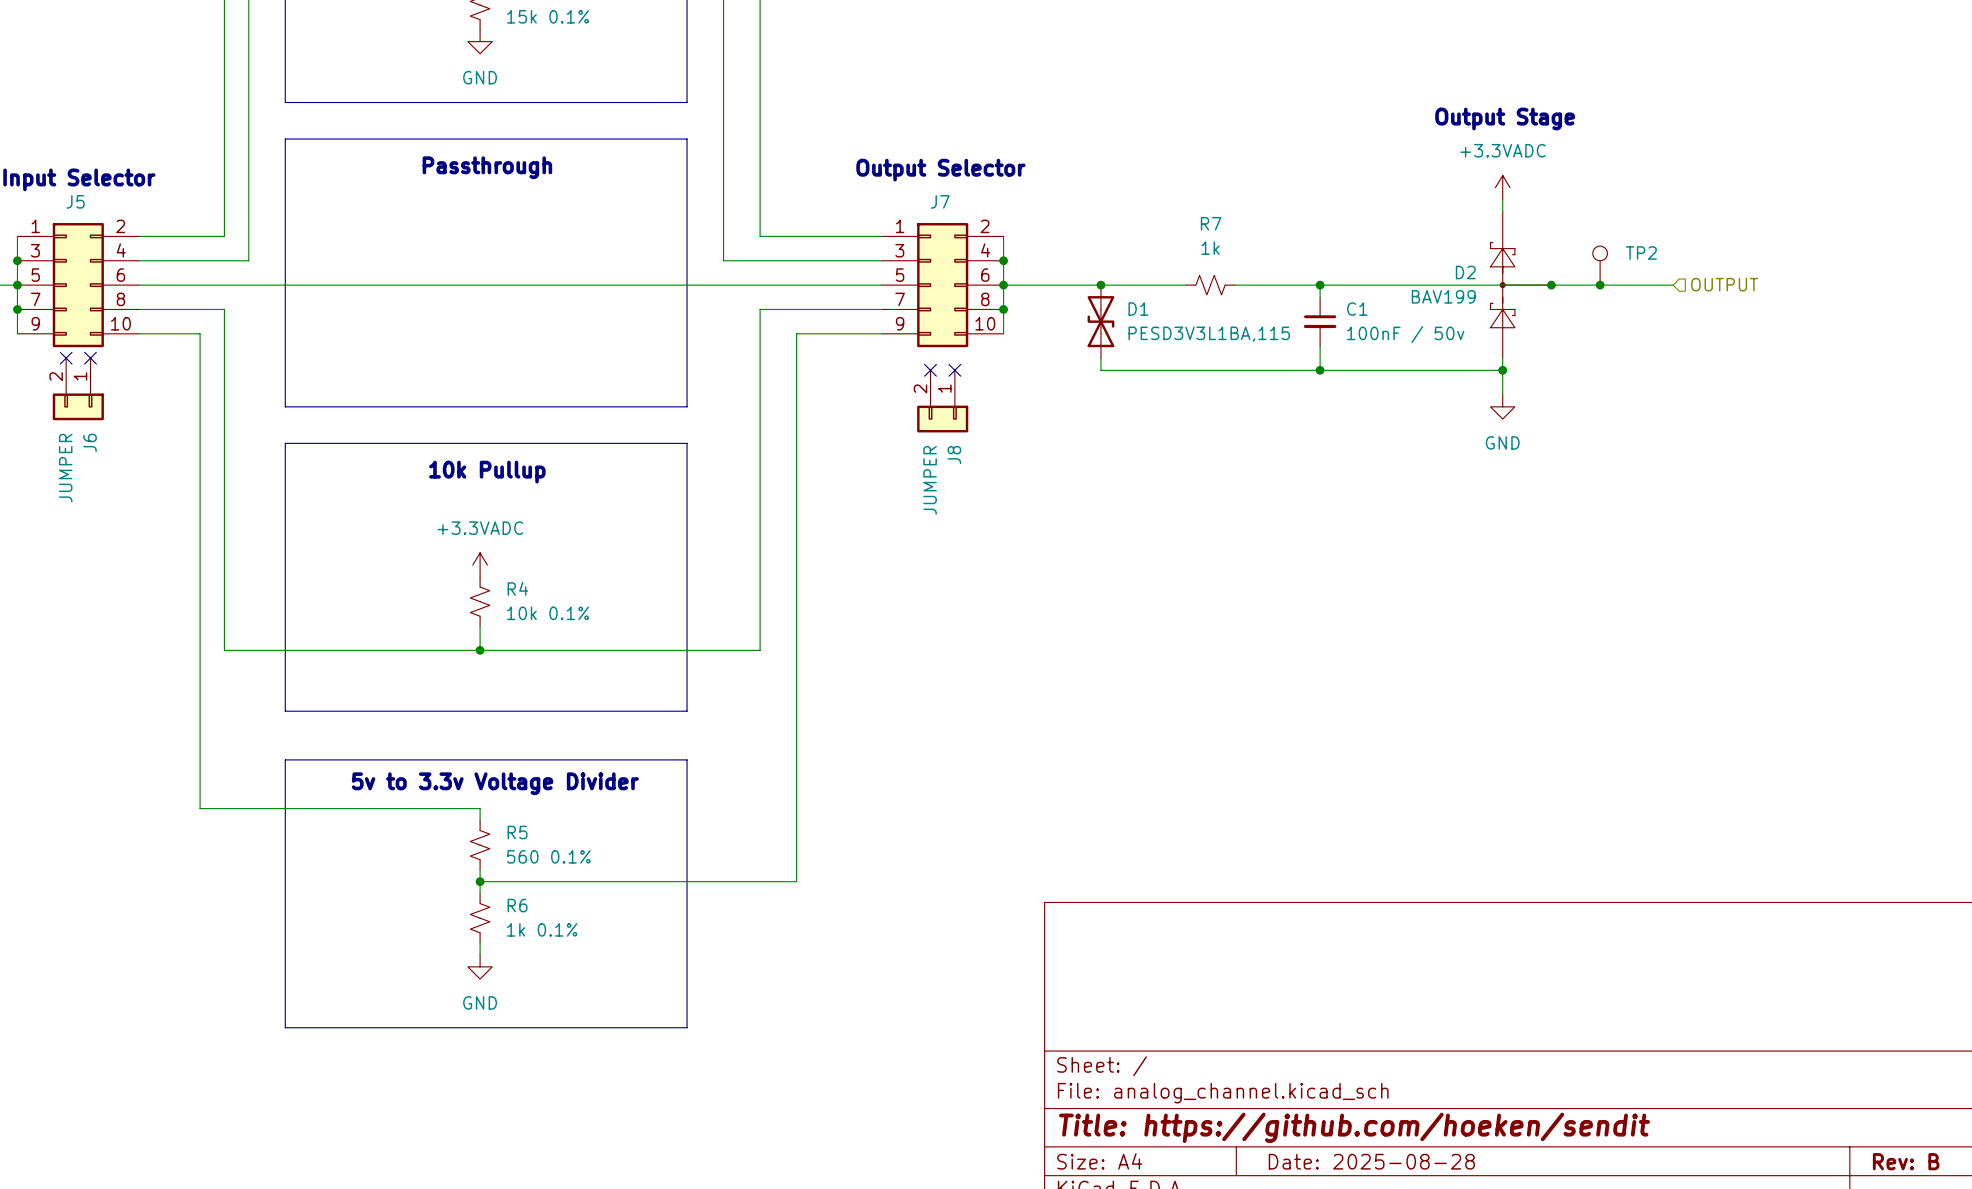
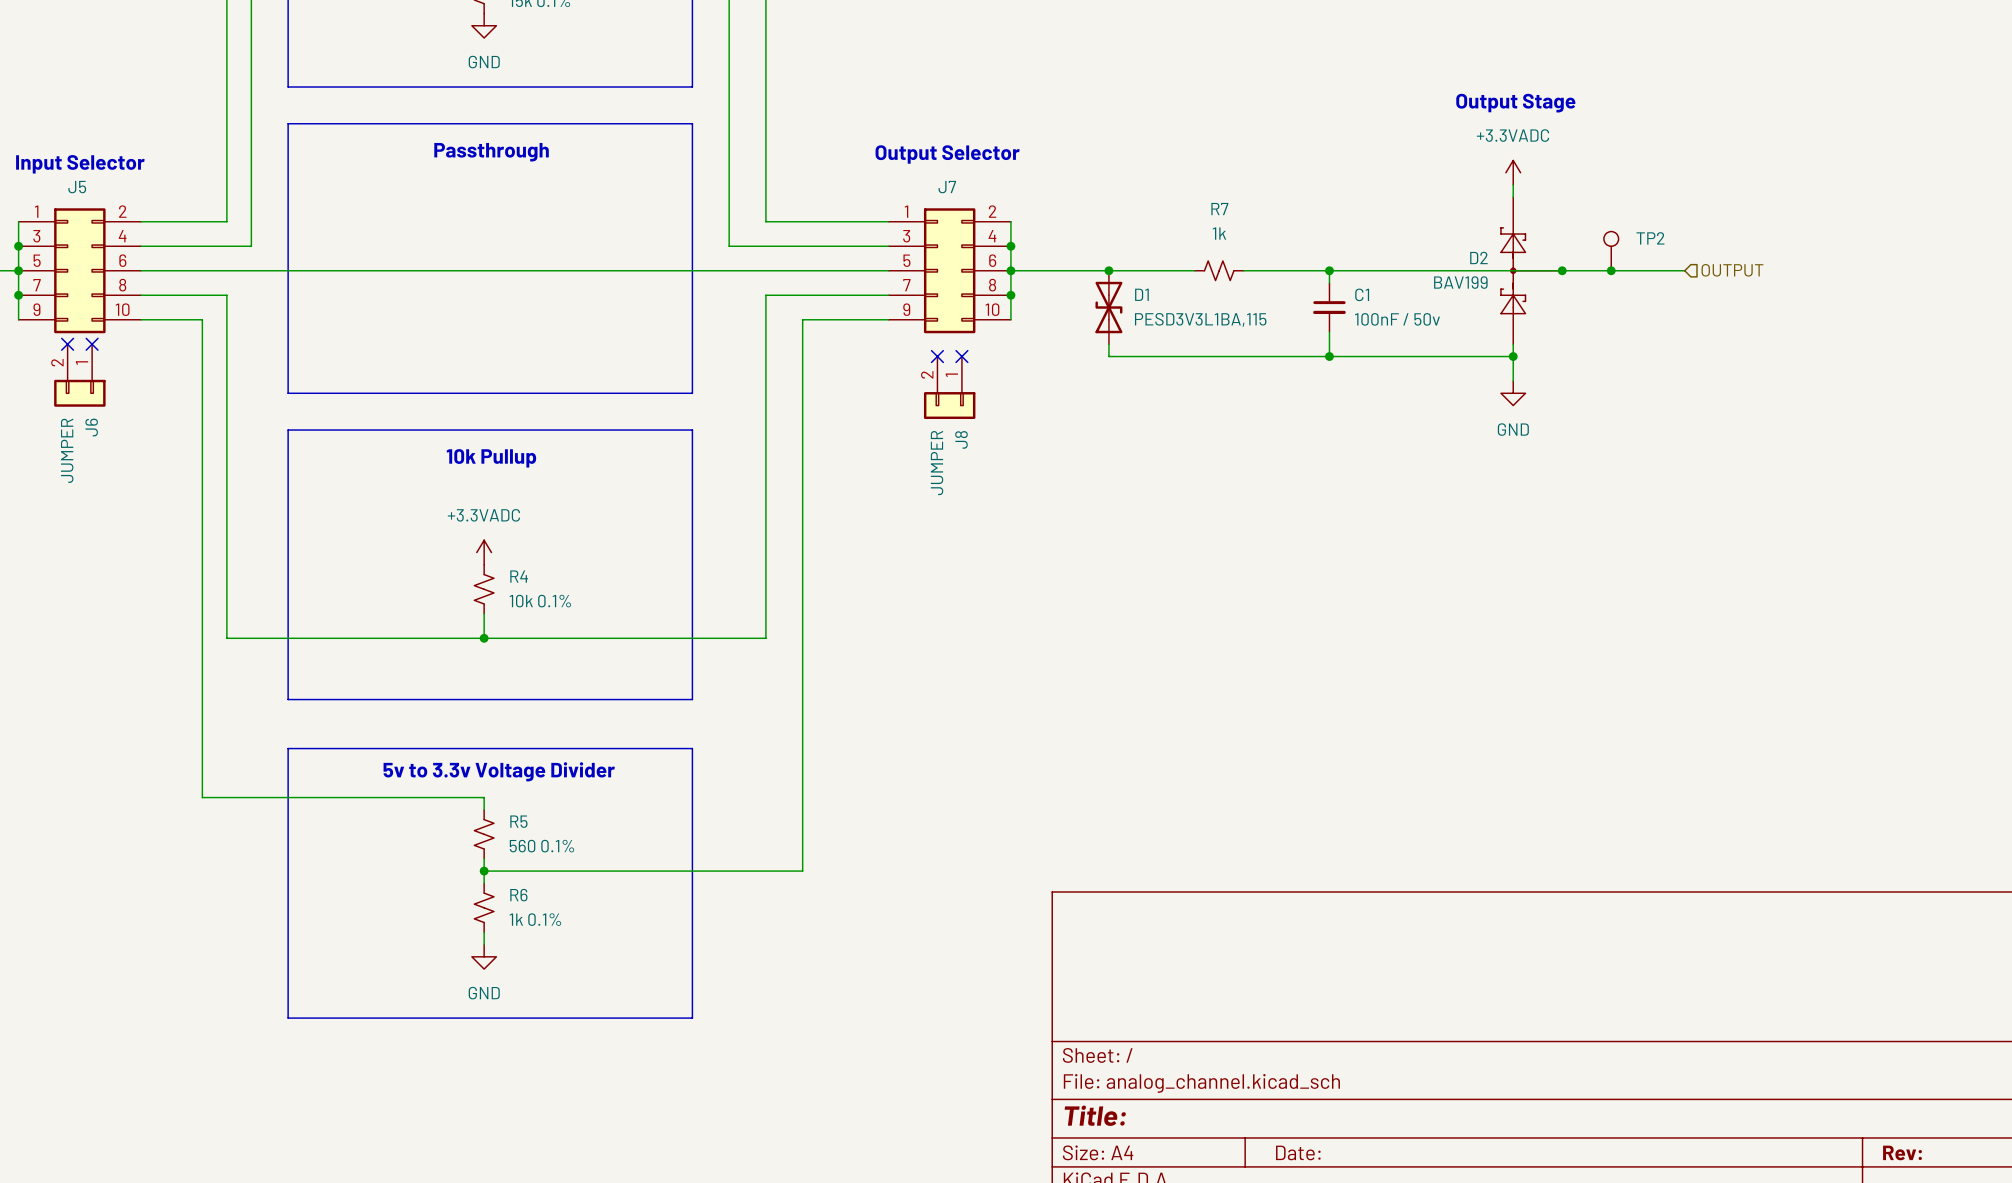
title block: Title: https://github.com/hoeken/sendit (1354, 1127) -> Title: (1095, 1115)
title block: Date: 2025-08-28 (1371, 1161) -> Date: (1298, 1152)
title block: Rev: B (1906, 1161) -> Rev: (1902, 1152)

